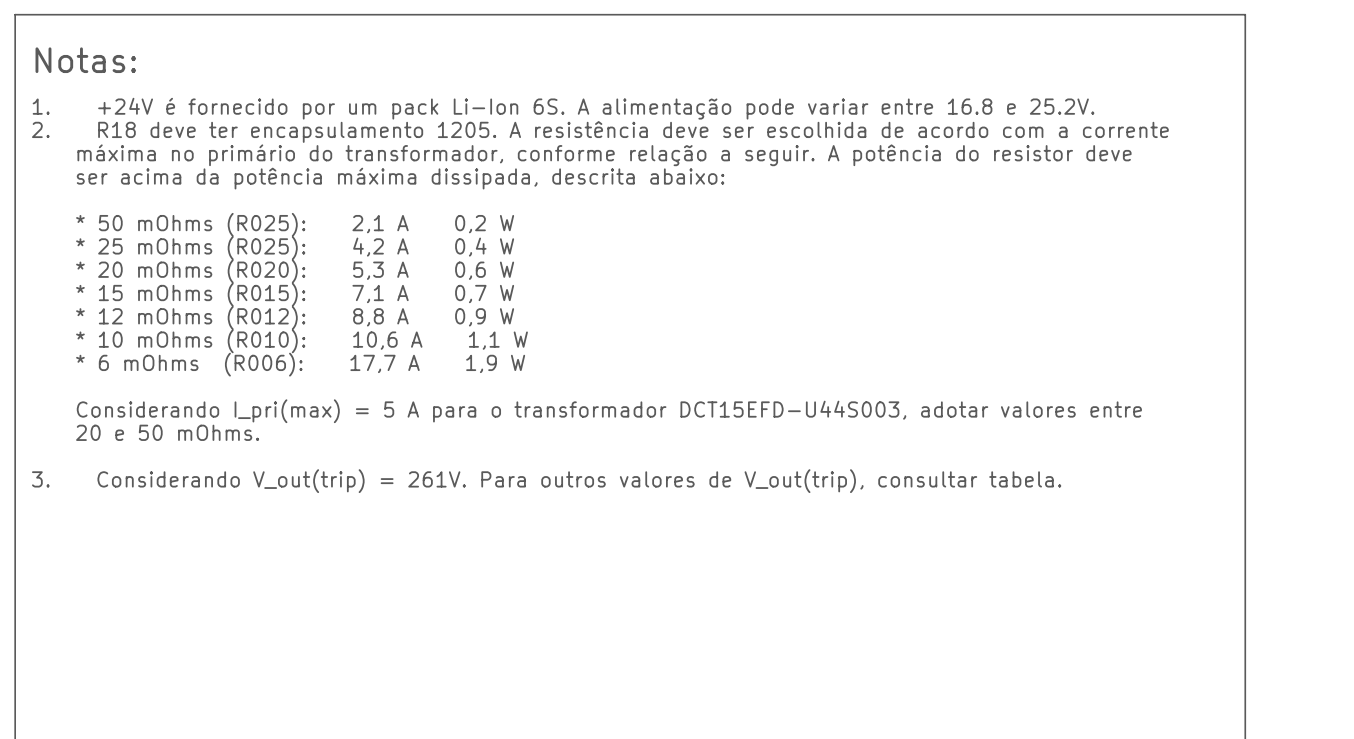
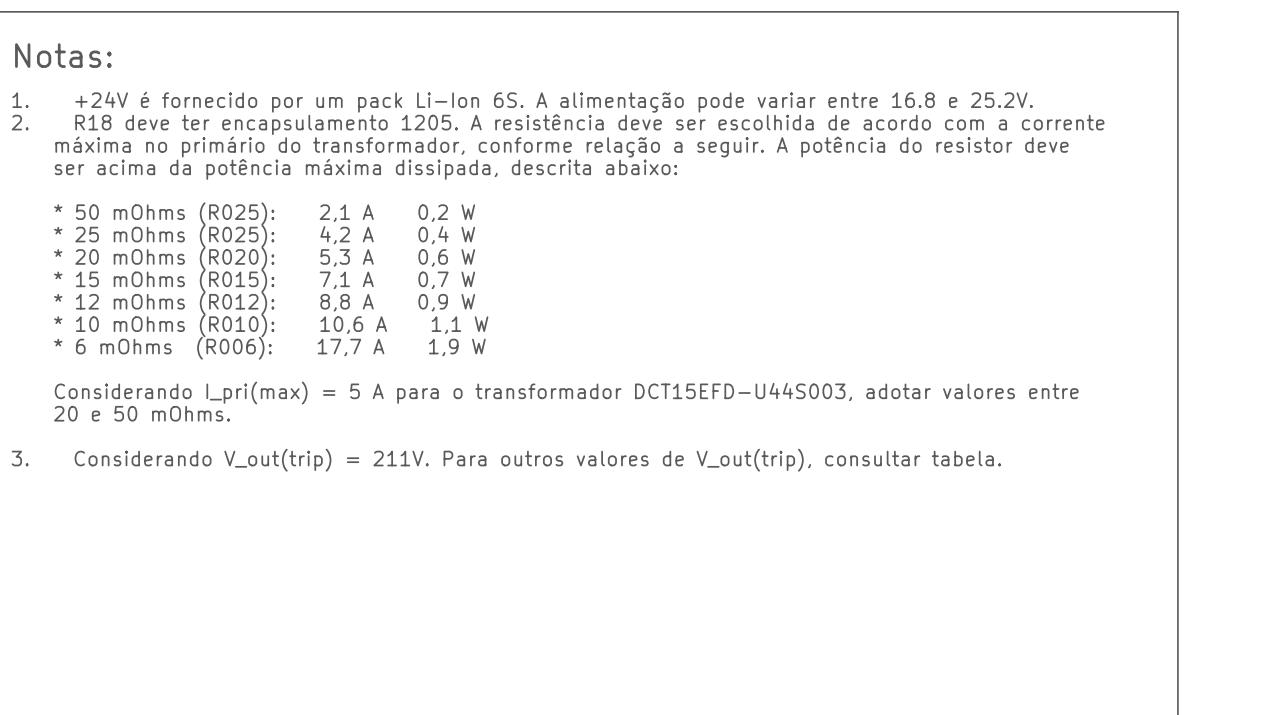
text: 3. Considerando V_out(trip) = 261V. Para outros valores de V_out(trip), consultar tabela. (546, 481) -> 3. Considerando V_out(trip) = 211V. Para outros valores de V_out(trip), consultar tabela. (506, 460)

